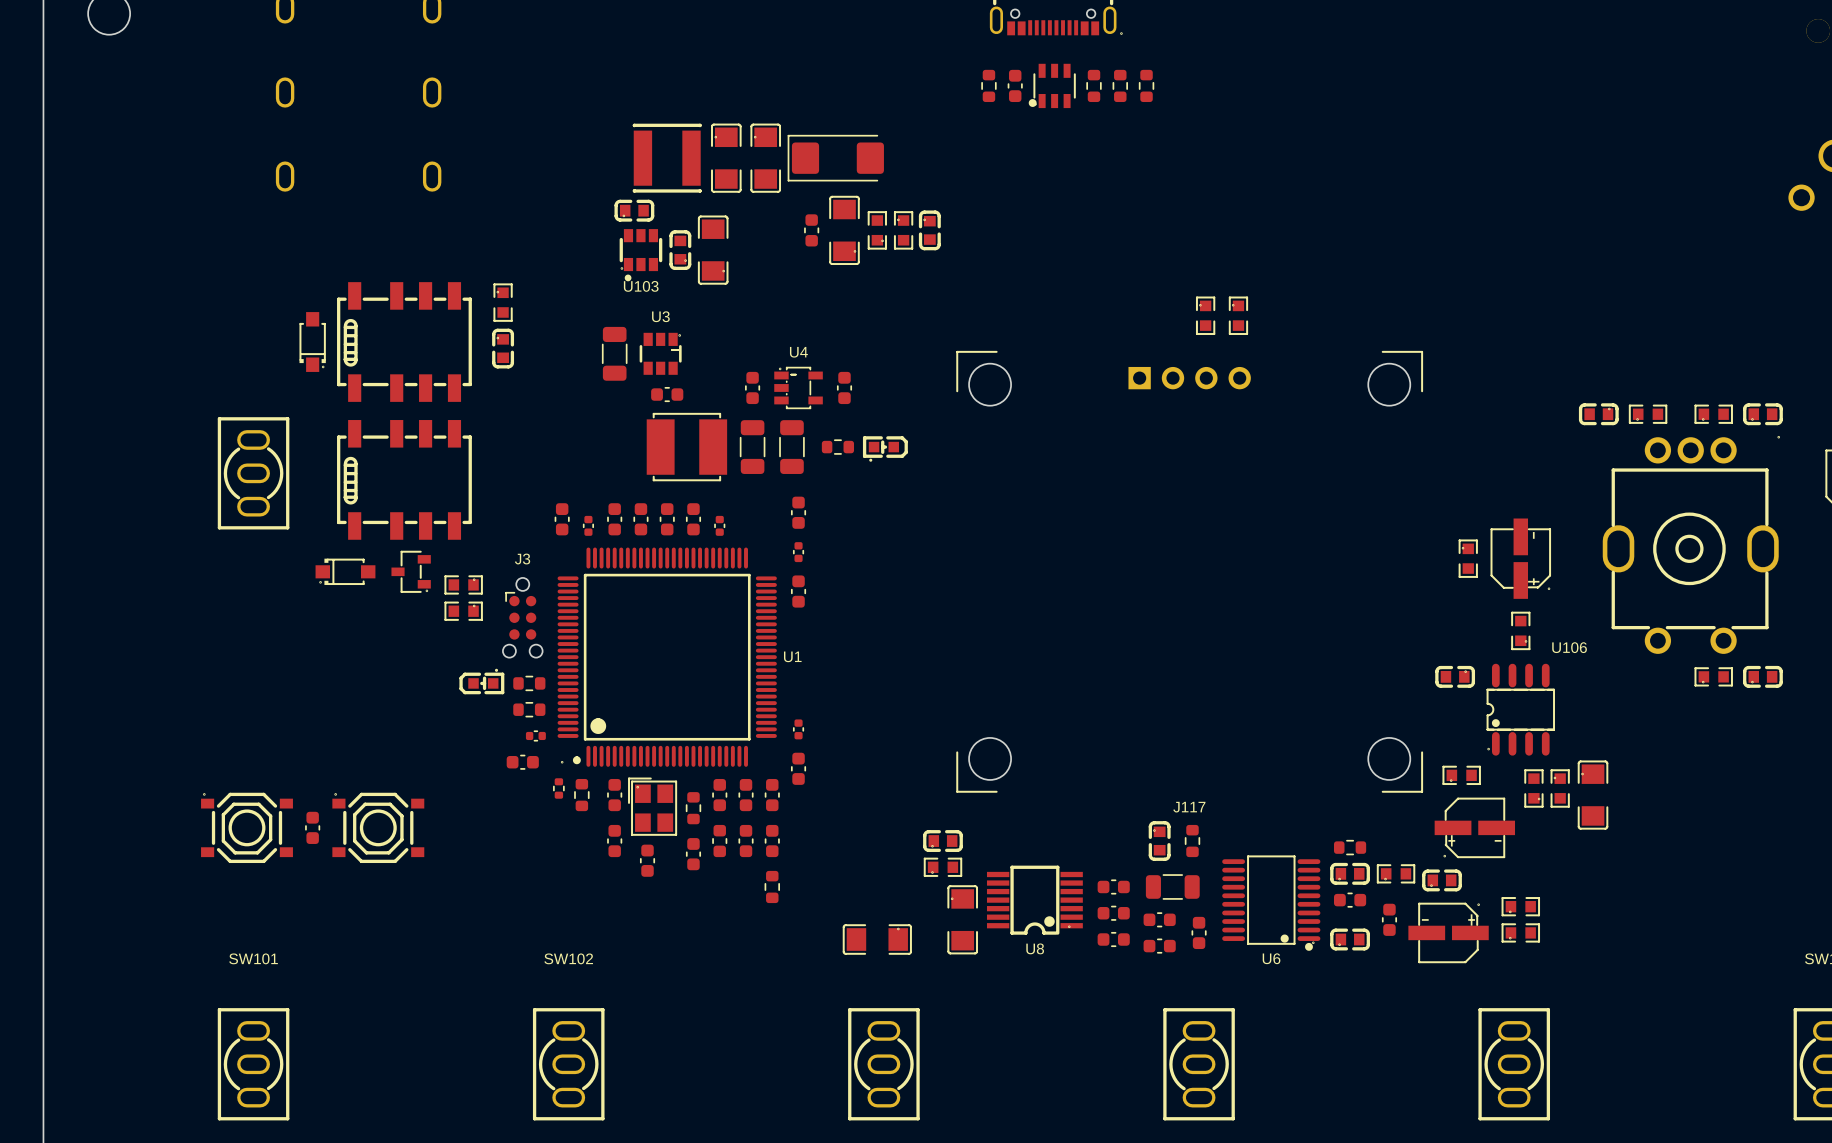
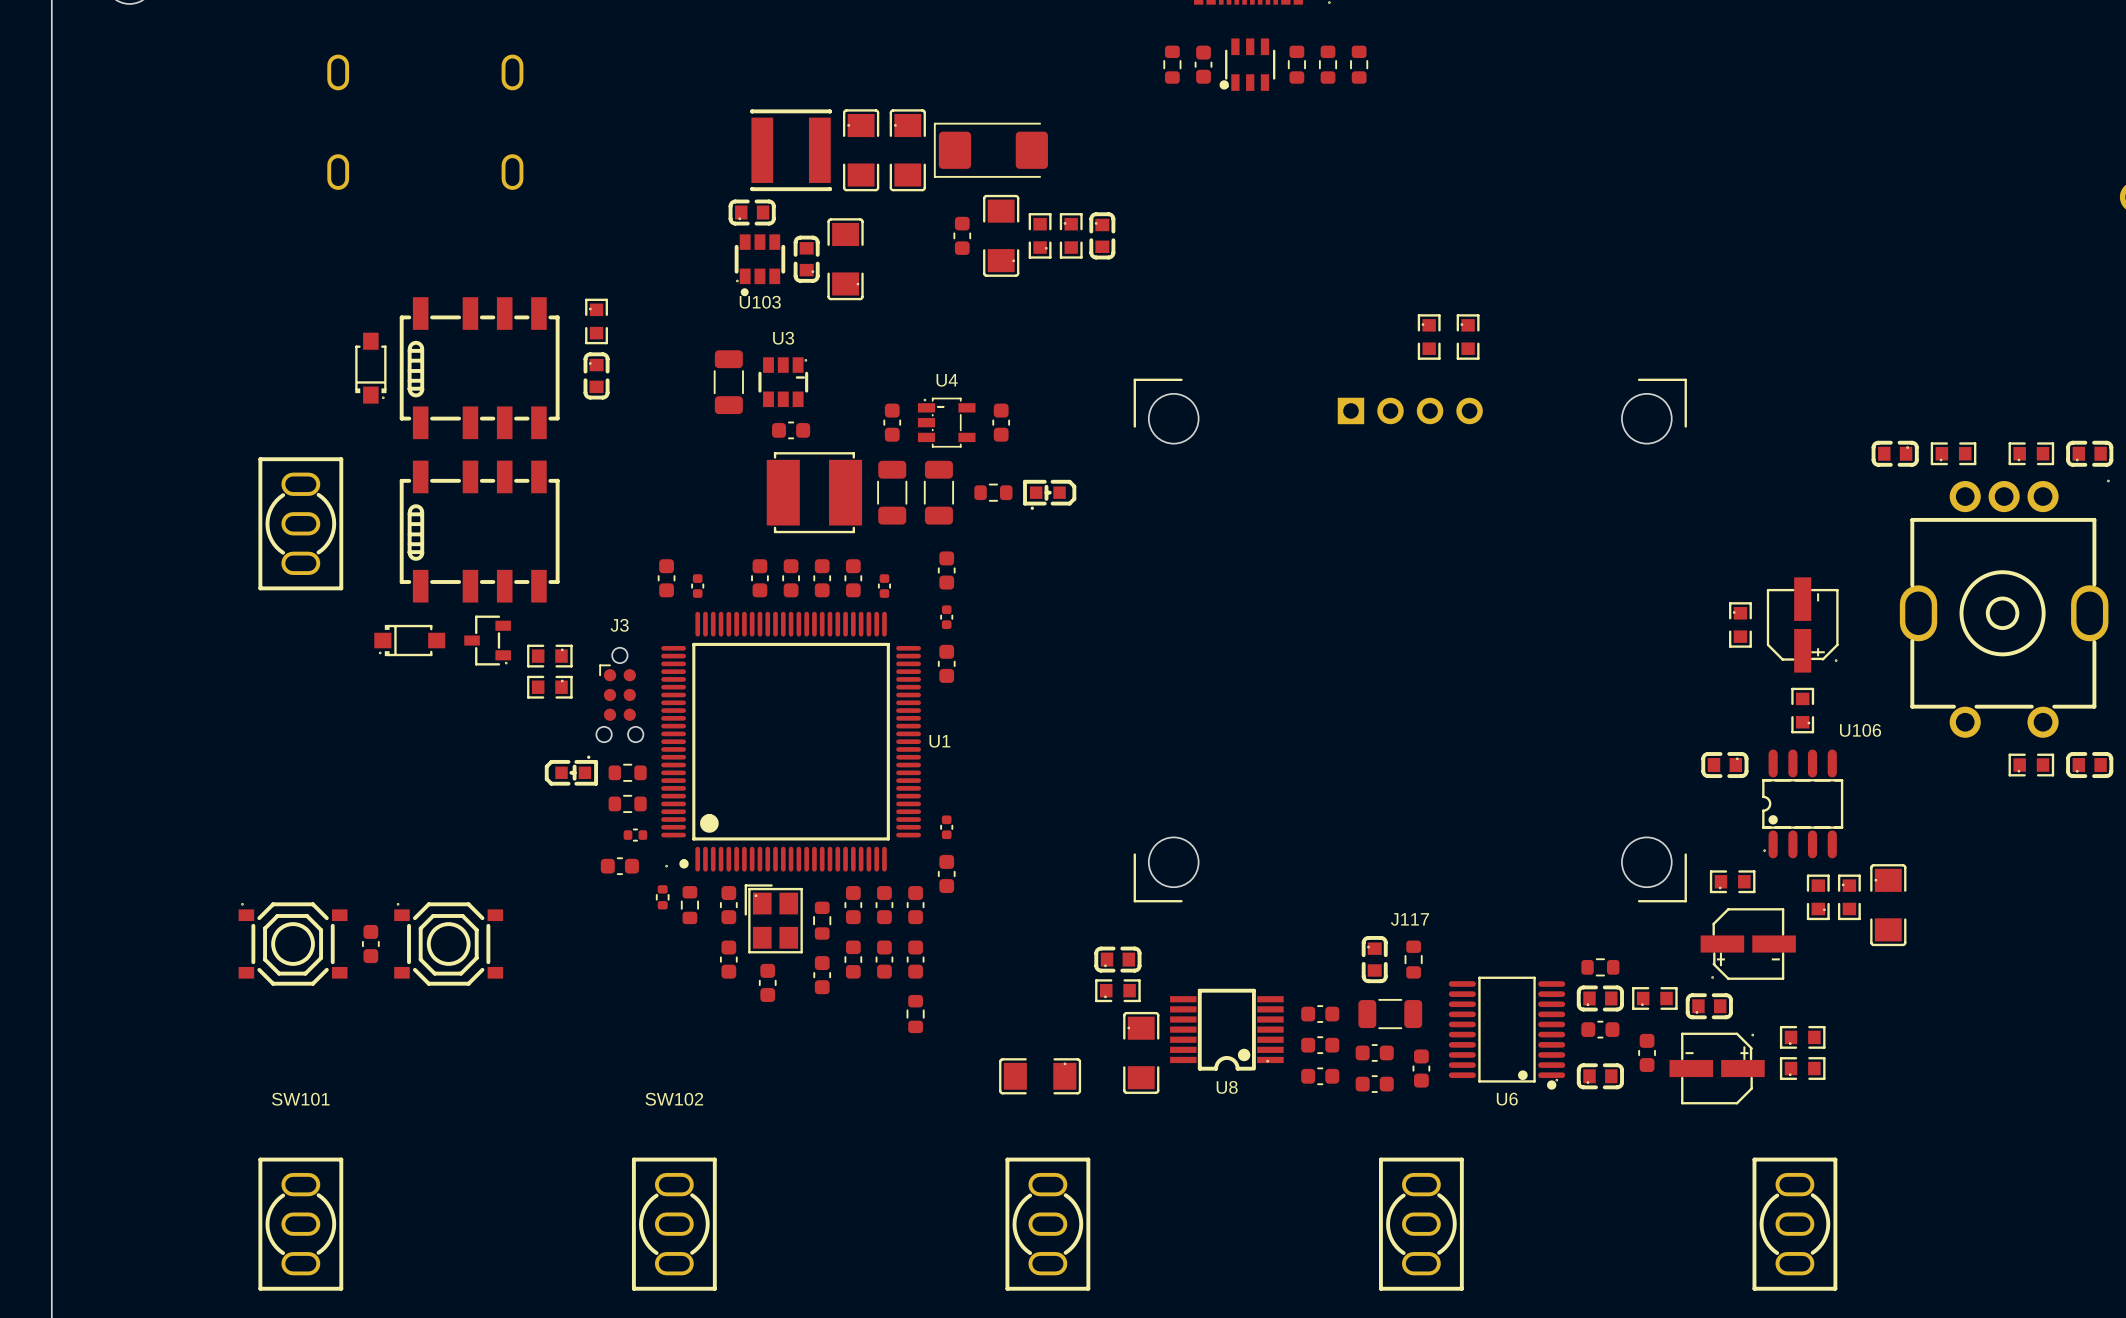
part footprint: [714, 515, 726, 536] -> [844, 559, 863, 598]
part: (614, 519) -> none
part: none -> (884, 586)

